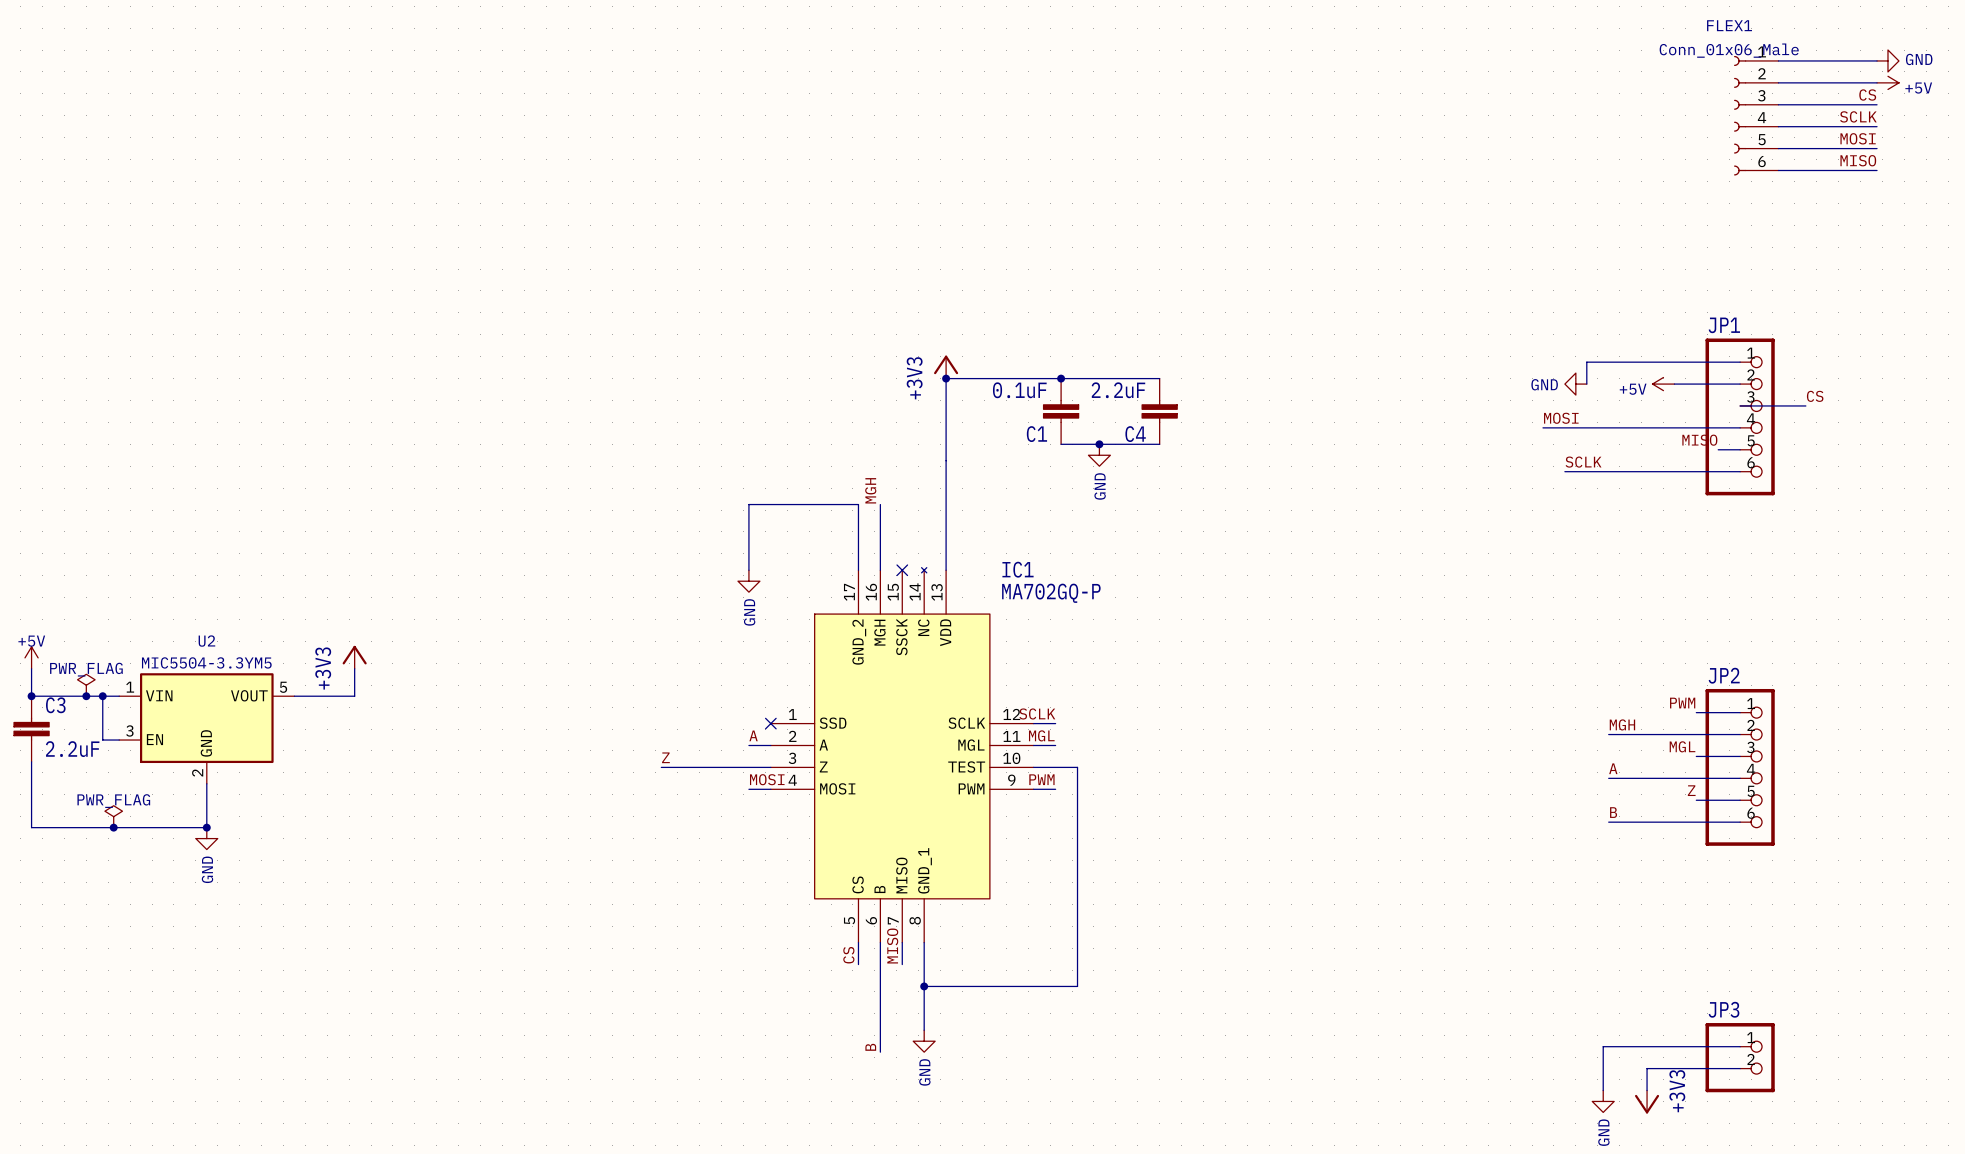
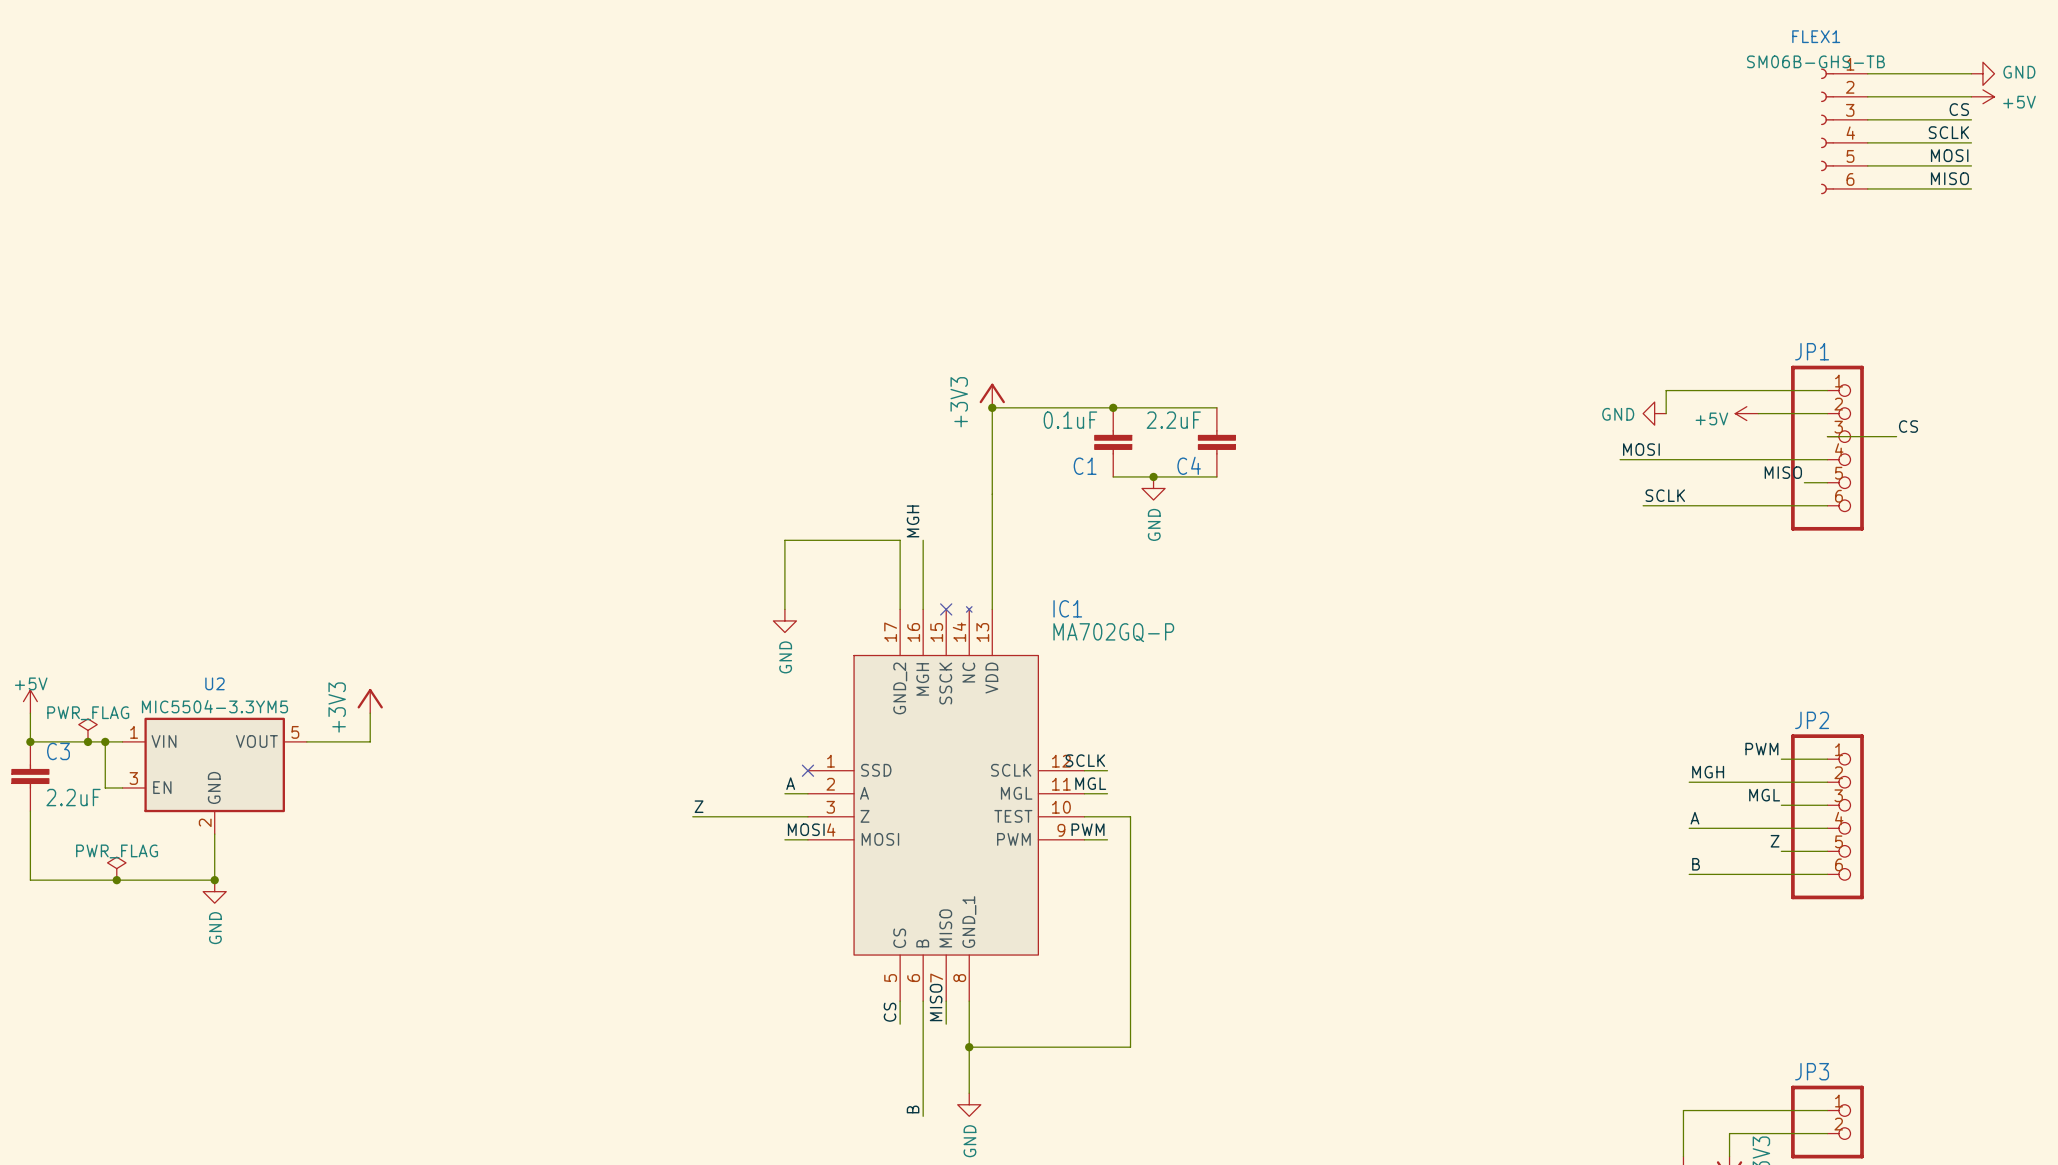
FLEX1 value: Conn_01x06_Male (1729, 50) -> SM06B-GHS-TB (1815, 61)

